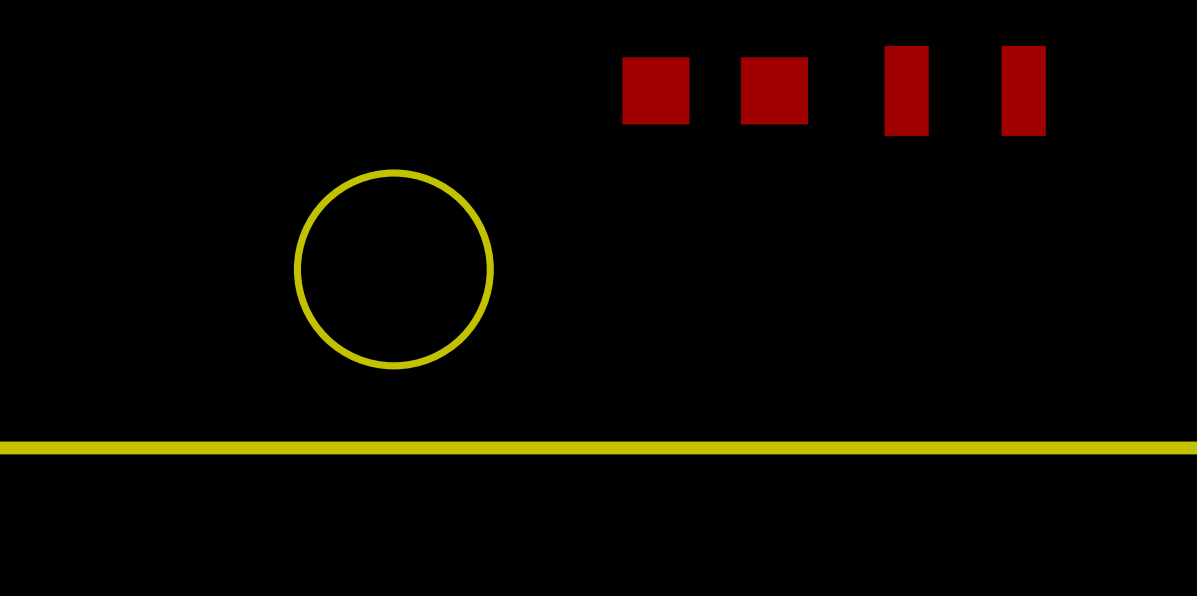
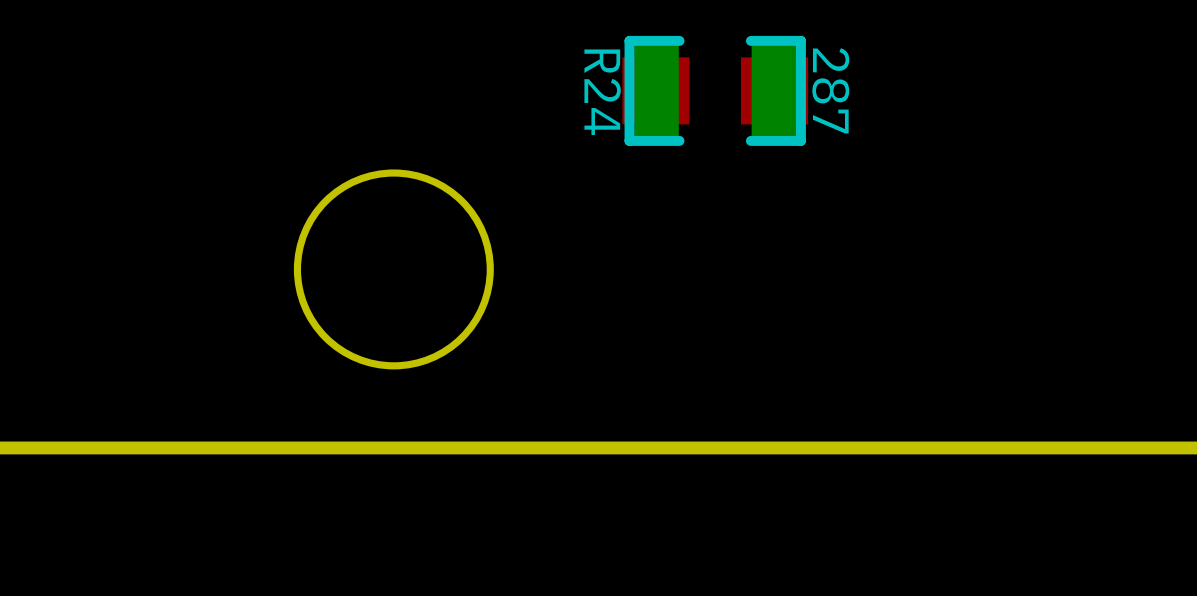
R24 side: top (965, 90) -> bottom (715, 90)

